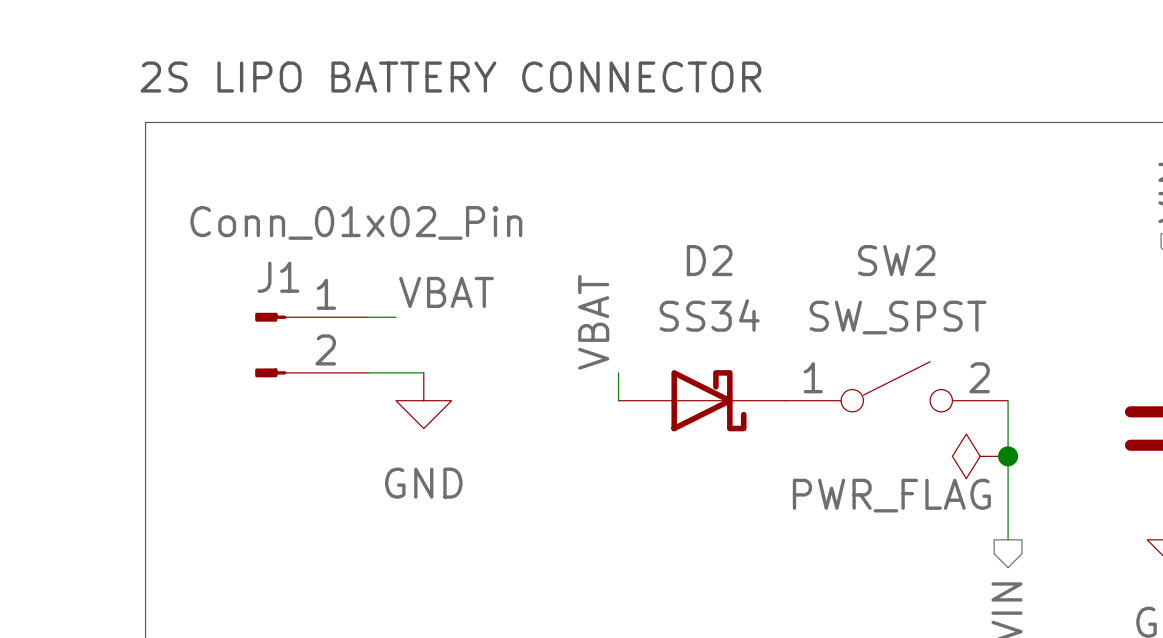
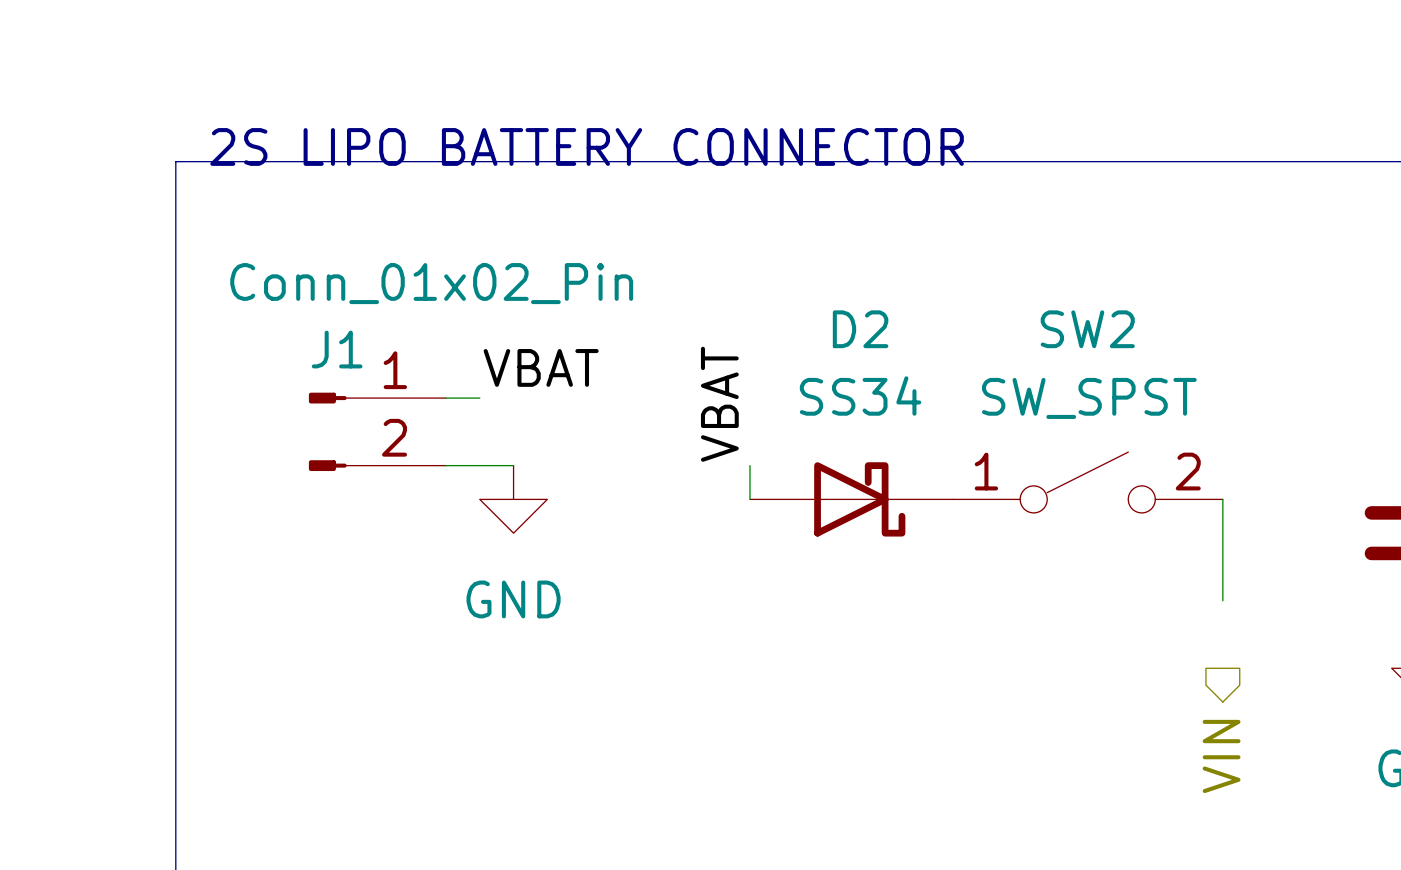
text position: 2S LIPO BATTERY CONNECTOR (450, 77) -> 2S LIPO BATTERY CONNECTOR (587, 146)
power symbol: PWR_FLAG (980, 456) -> none
junction: (1008, 456) -> none
wire: (1008, 484) (1008, 539) -> none

